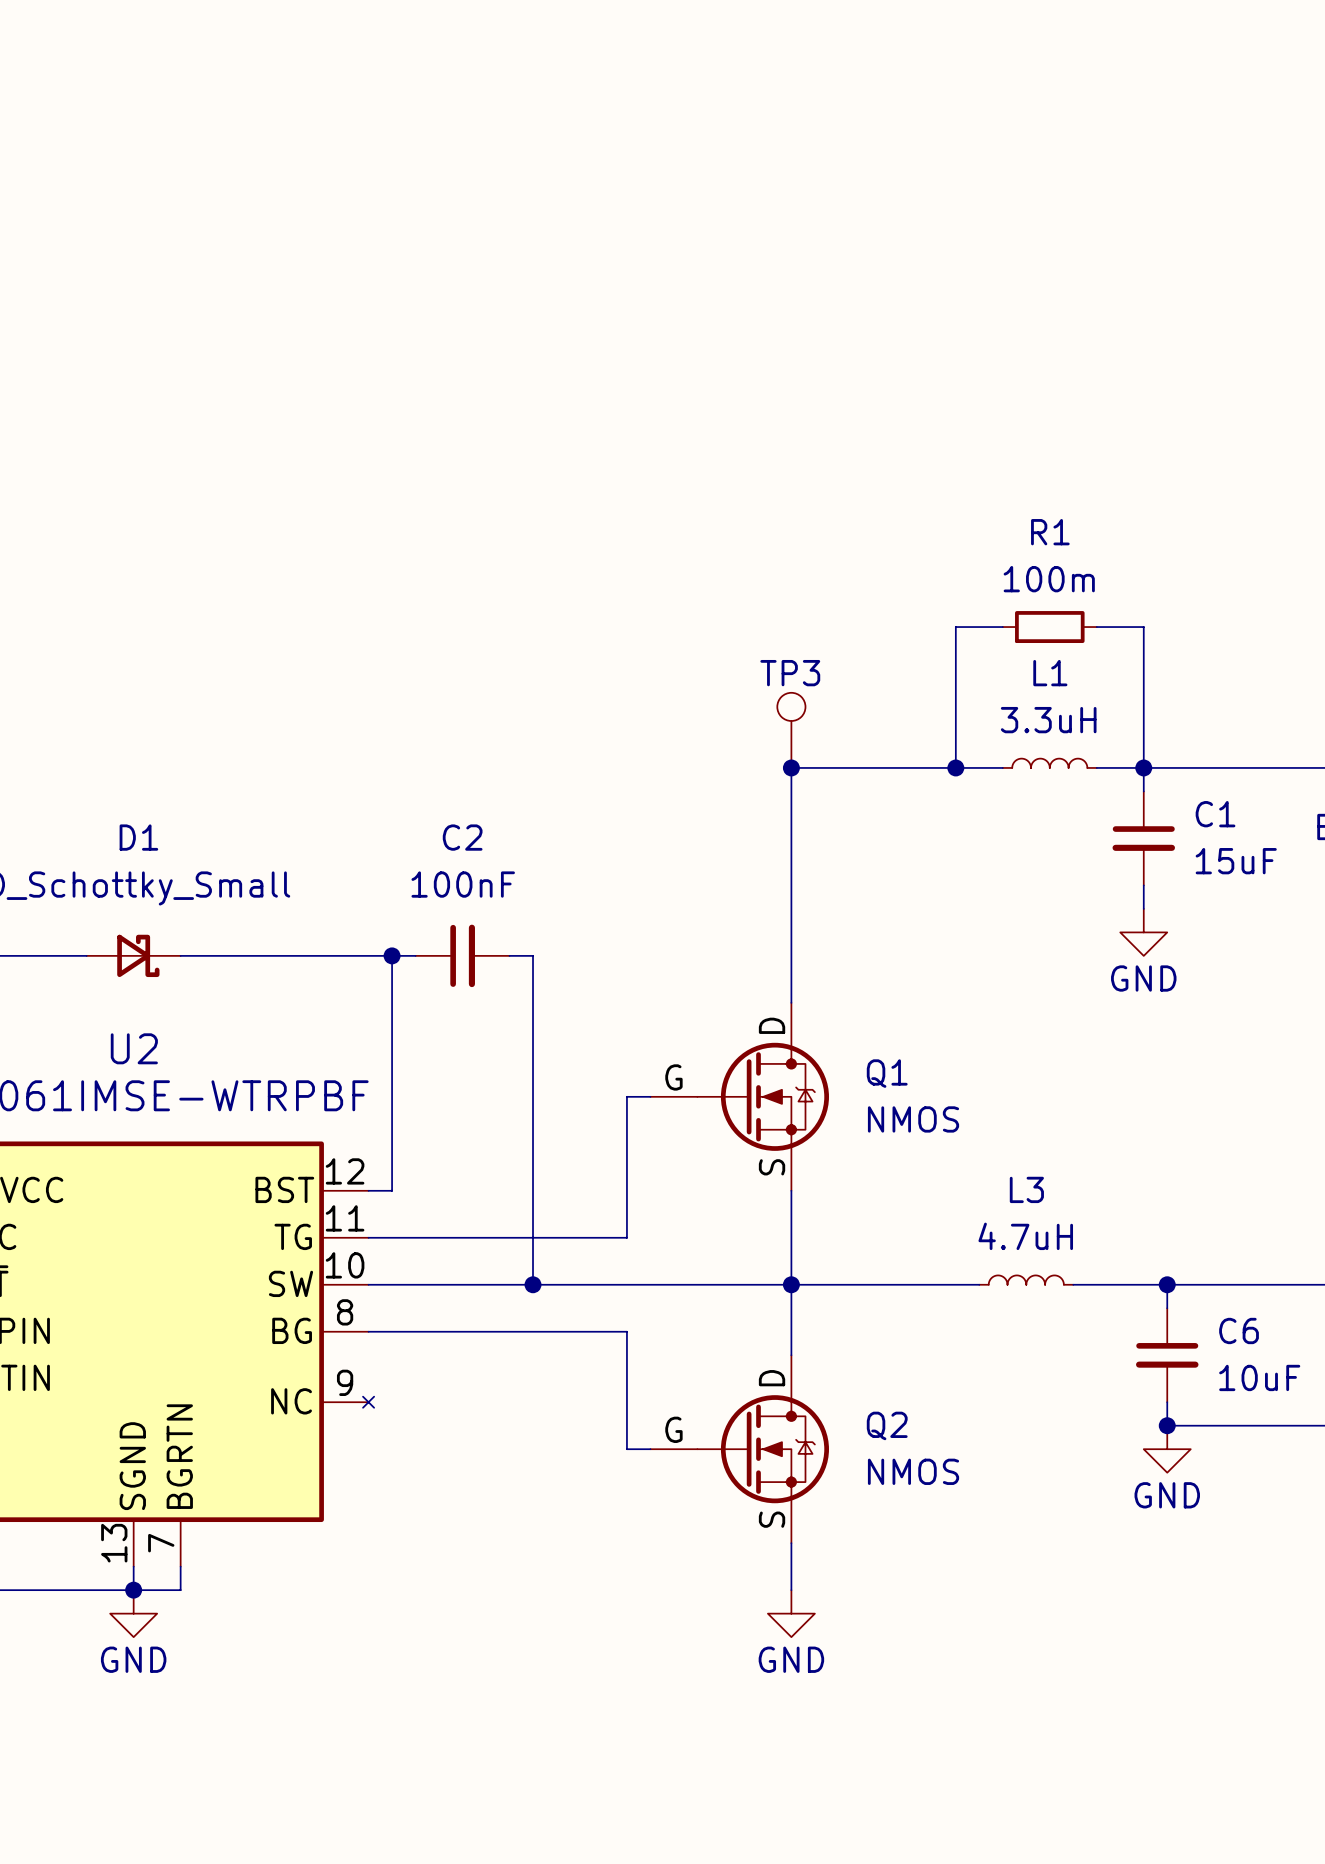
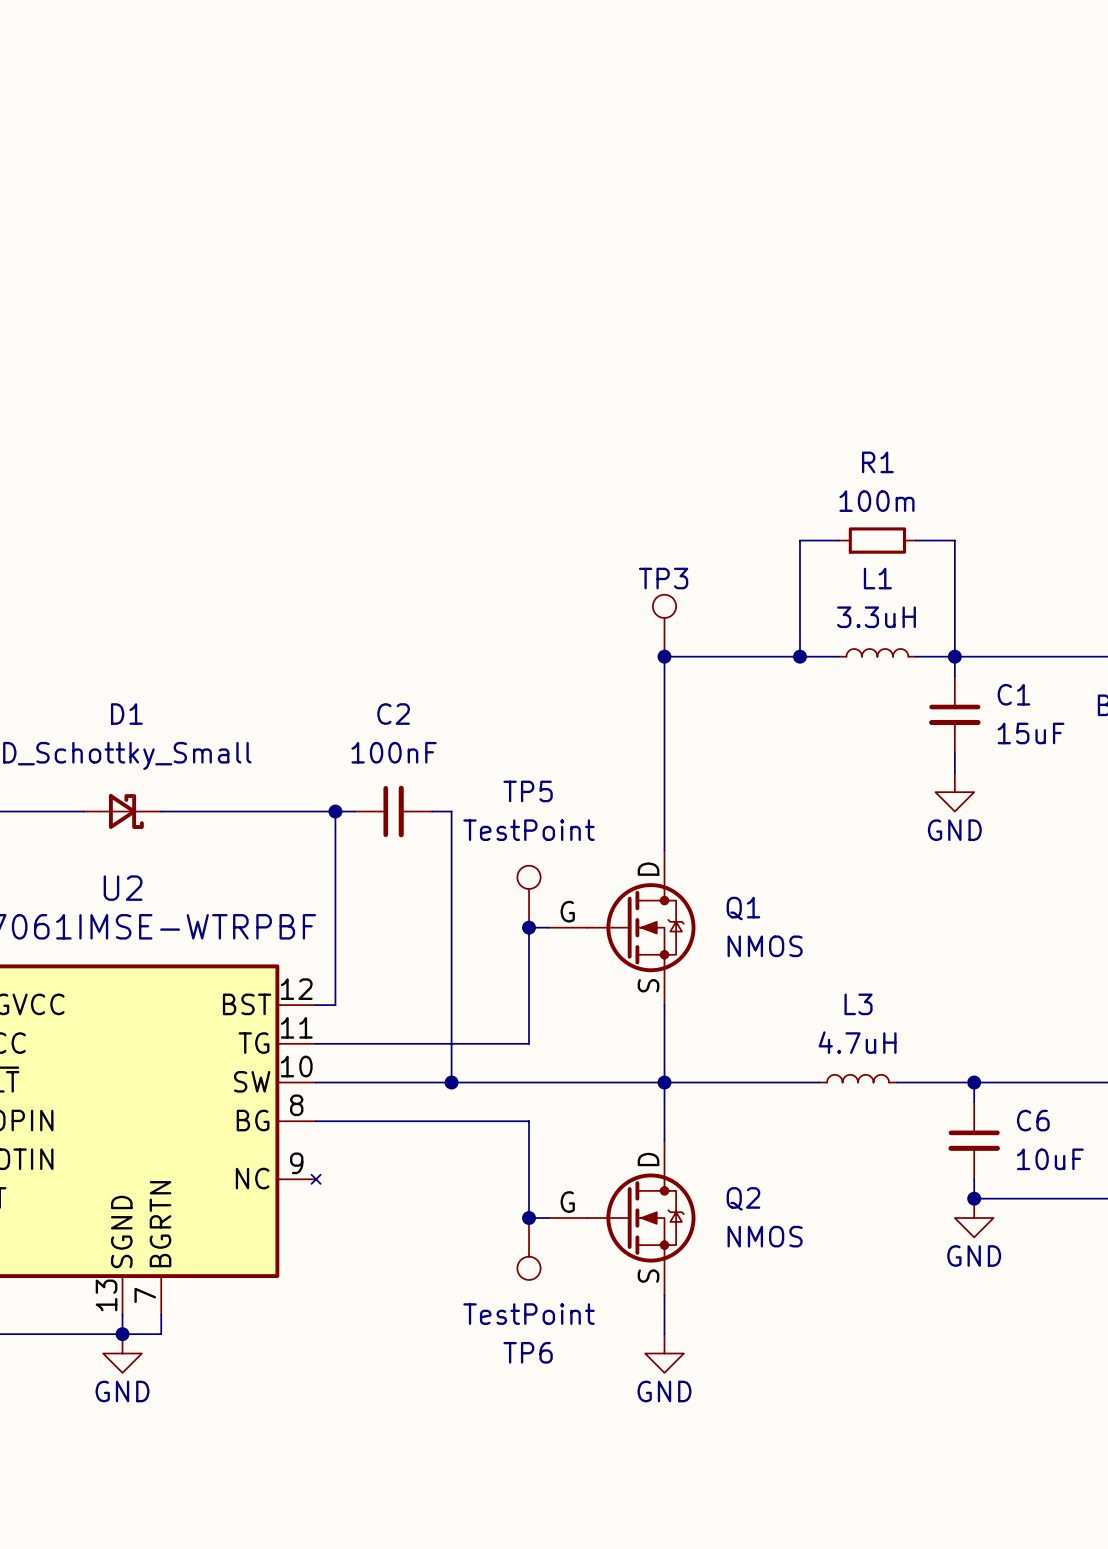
TP5: none -> TestPoint (529, 896)
junction: none -> (529, 927)
junction: none -> (529, 1218)
TP6: none -> TestPoint (529, 1248)

